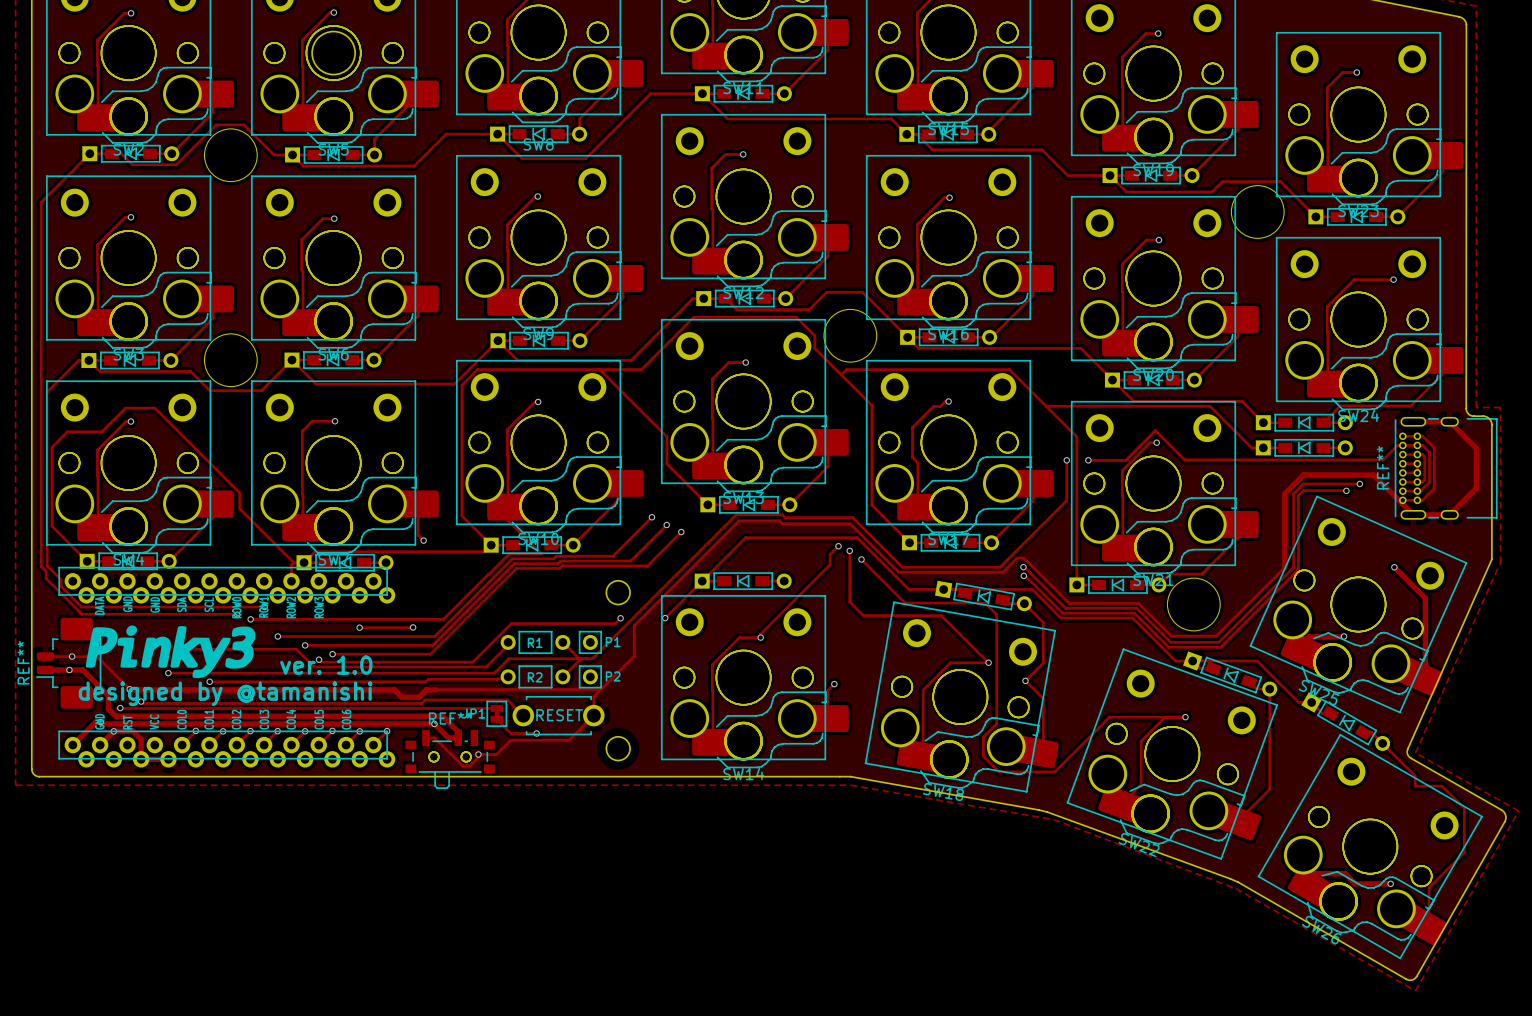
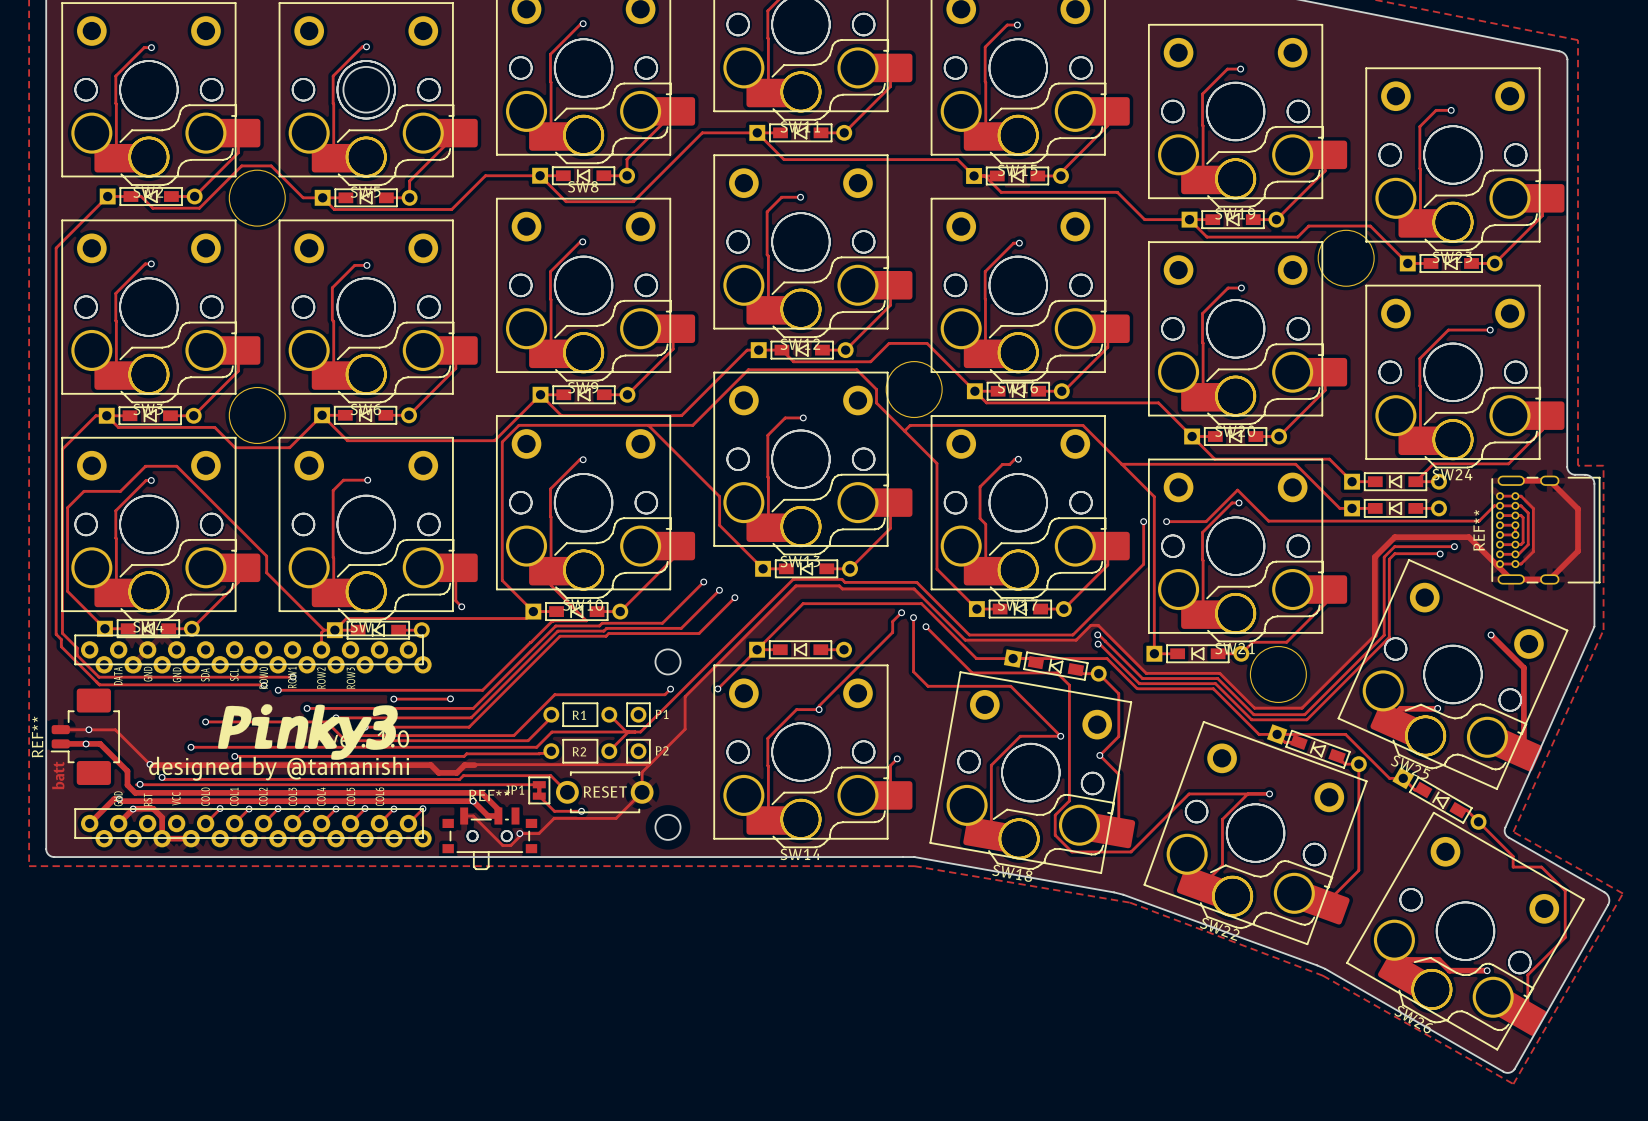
drawing position: (170, 651) -> (307, 732)
text: none -> batt (58, 775)

